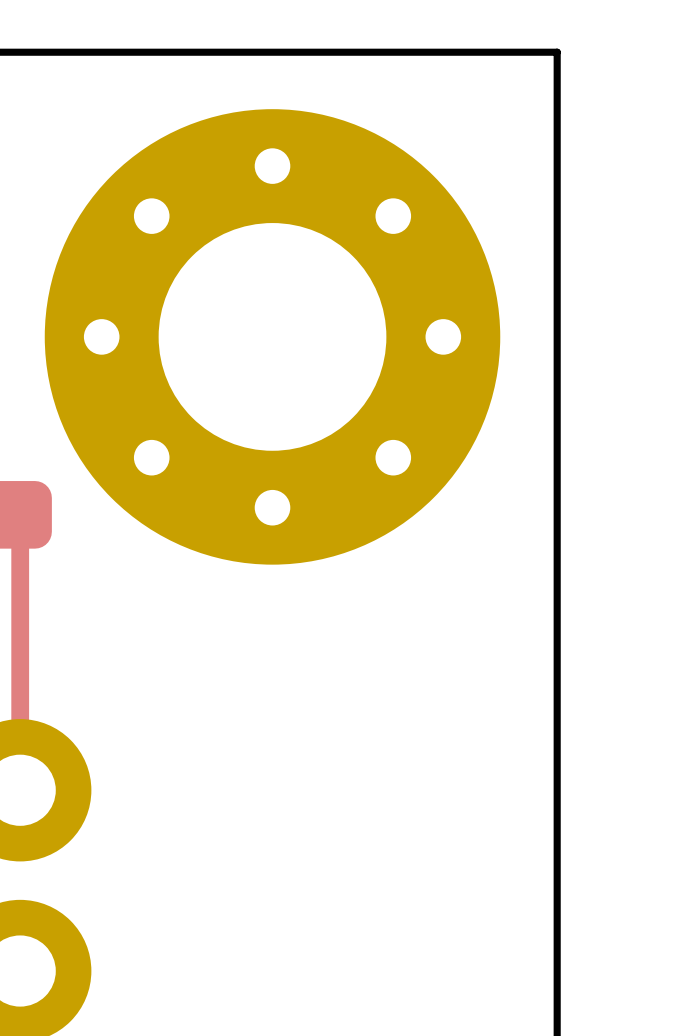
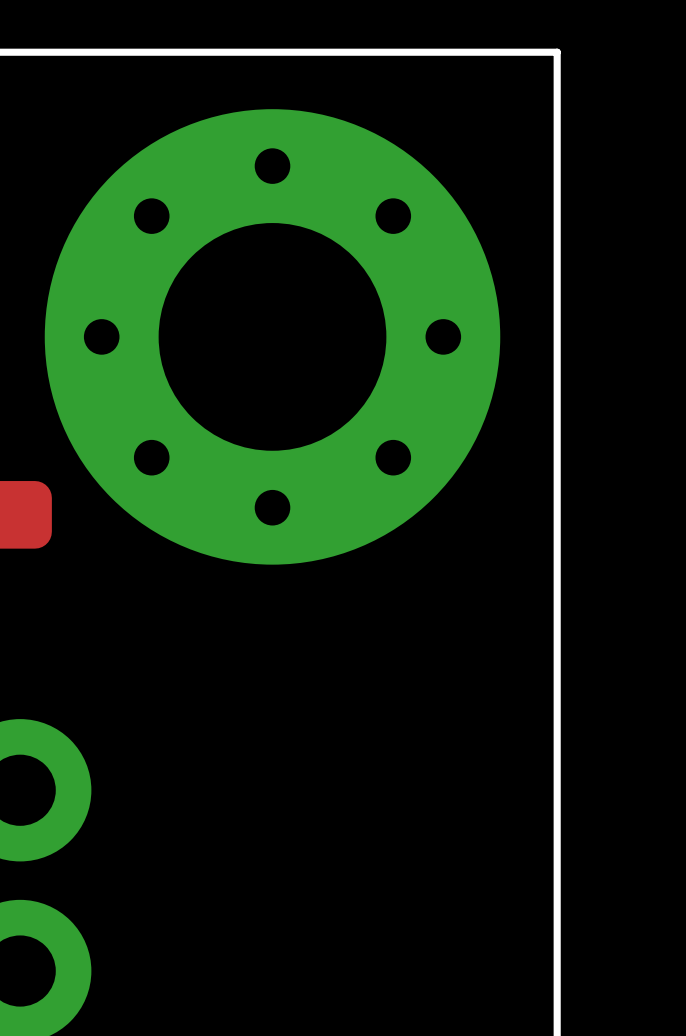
top track: (17, 514) (20, 517) (20, 790) -> none

